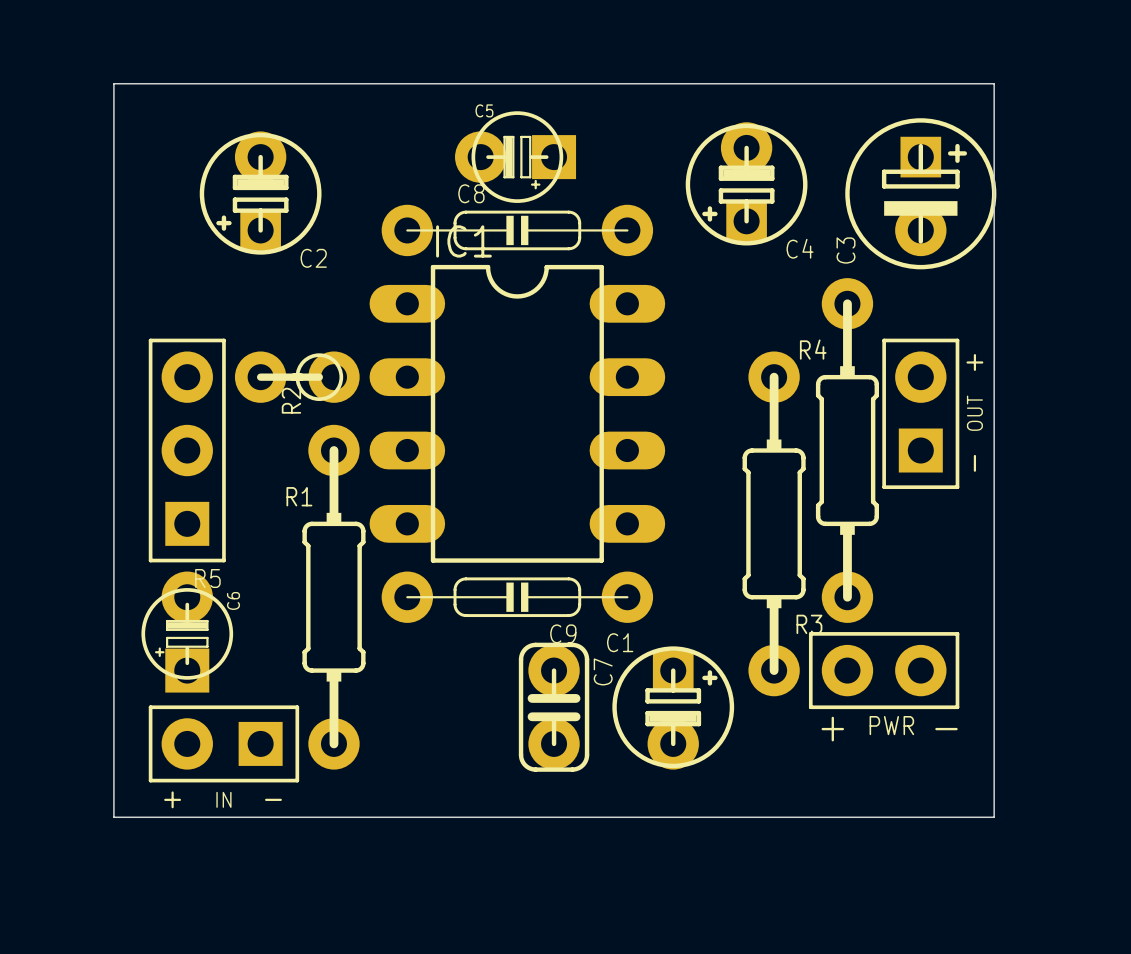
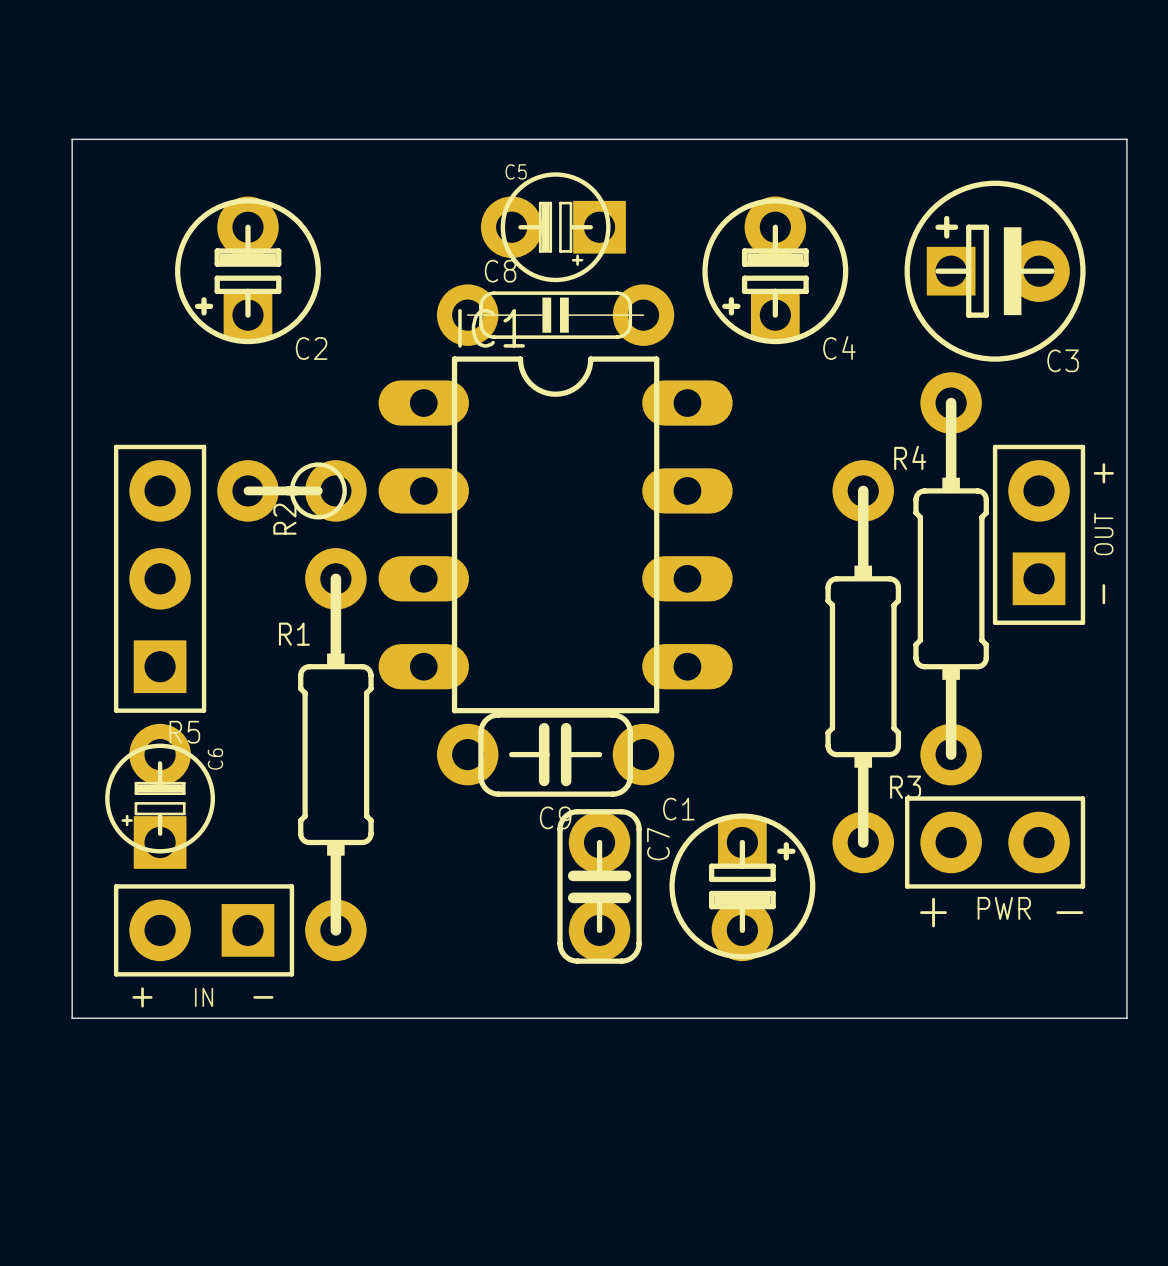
C4 position: (746, 183) -> (775, 270)
C3 rotation: 0° (920, 193) -> 90° counterclockwise (995, 271)
C8 footprint: [381, 204, 654, 257] -> [436, 284, 675, 346]
C9 footprint: [381, 571, 654, 623] -> [436, 712, 675, 797]

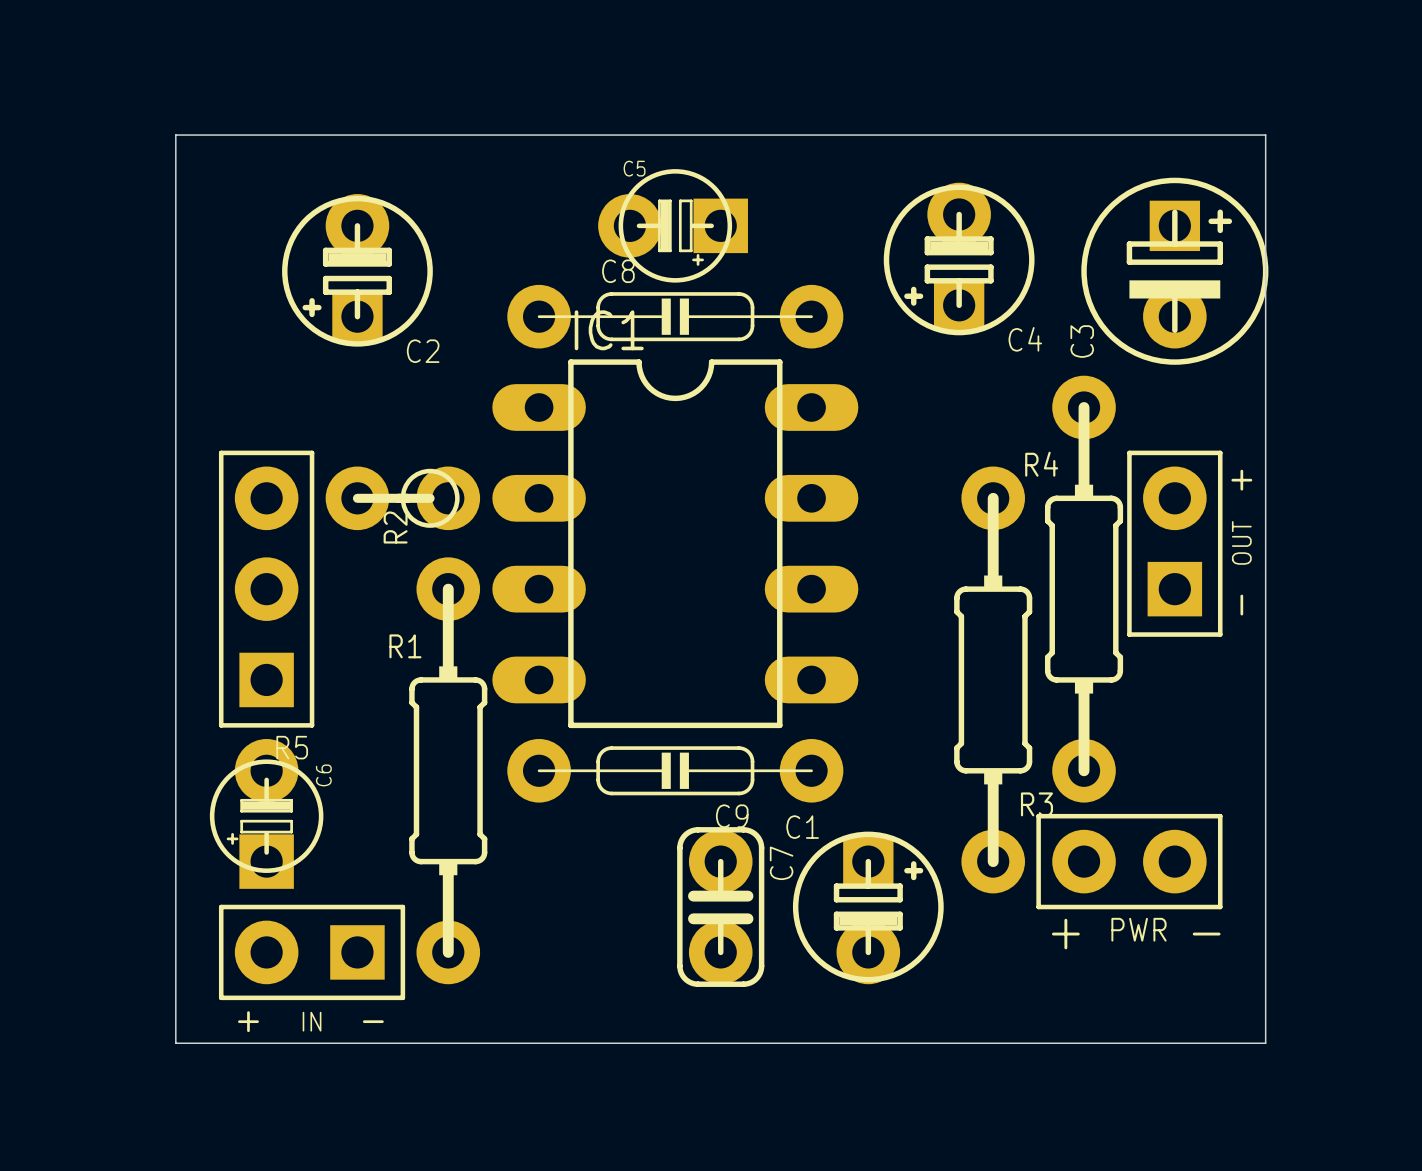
C4 position: (775, 270) -> (959, 259)
C3 rotation: 0° (995, 271) -> 90° clockwise (1174, 271)
C8 footprint: [436, 284, 675, 346] -> [507, 284, 844, 349]
C9 footprint: [436, 712, 675, 797] -> [507, 738, 844, 803]

